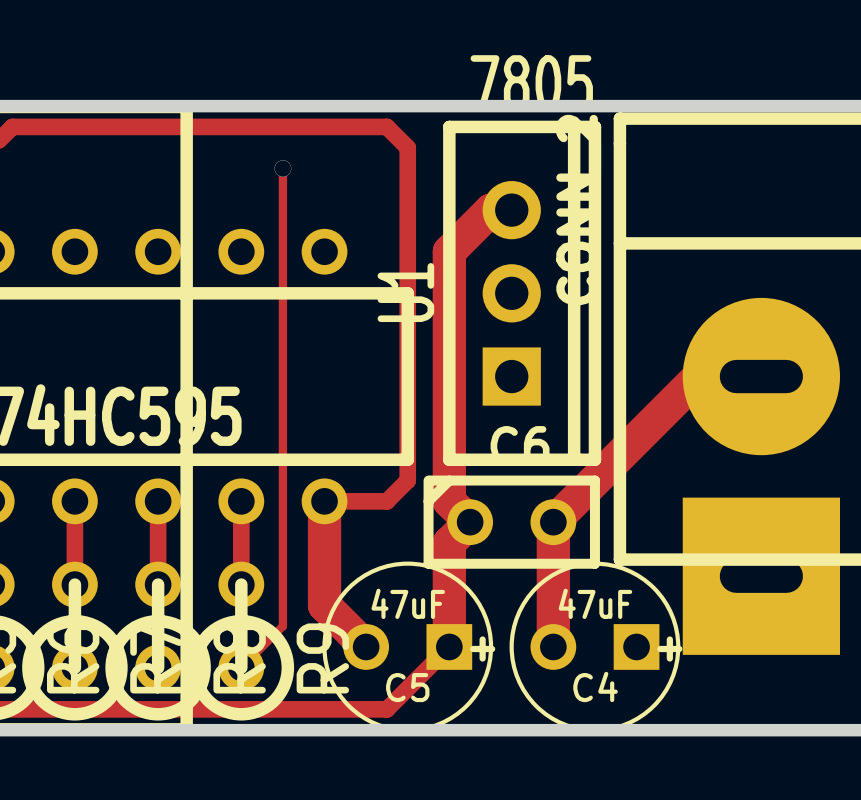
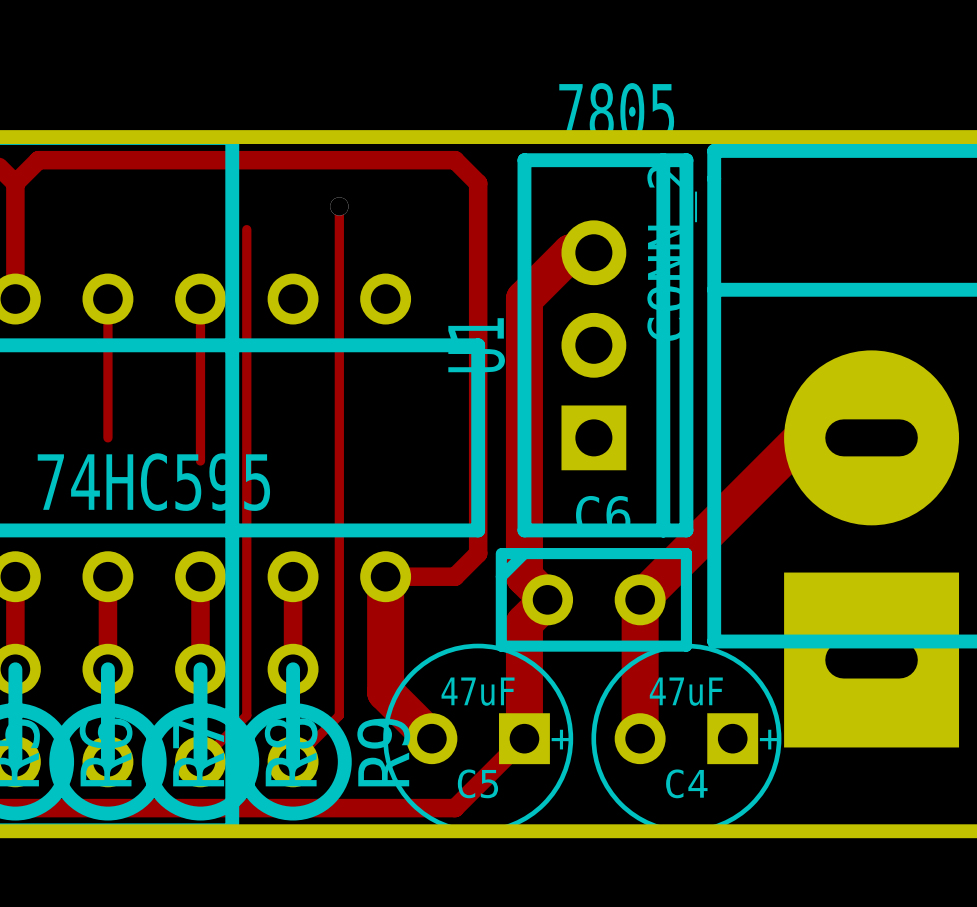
track: none -> (246, 229) (246, 715) (200, 761)
track: none -> (107, 299) (107, 437)
track: none -> (200, 299) (200, 461)

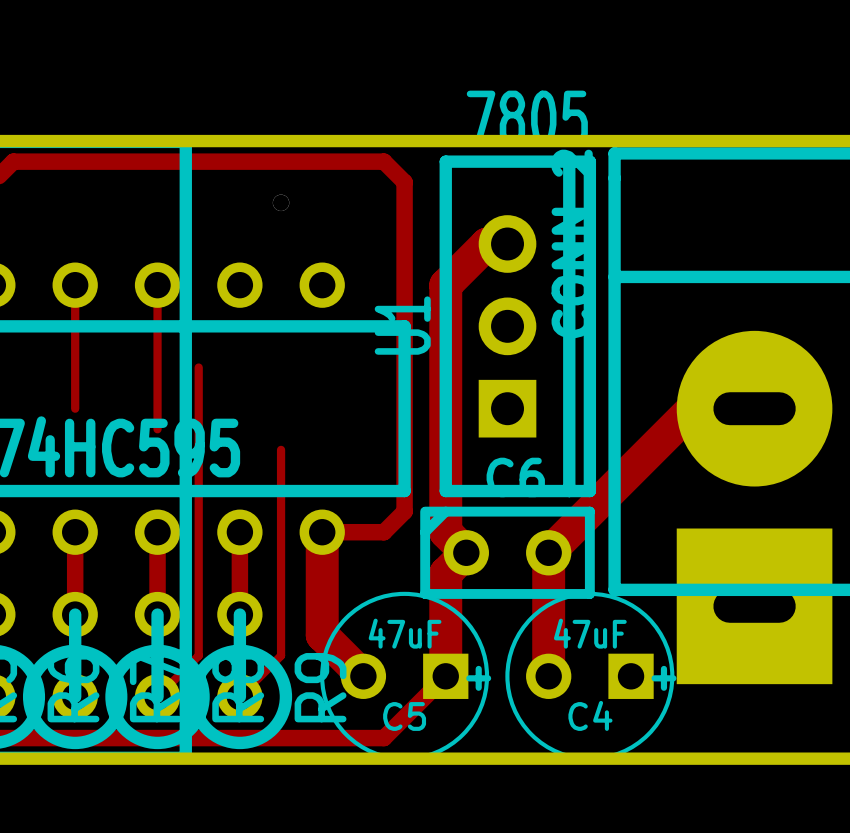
track: (339, 206) (339, 484) -> none
track: (246, 229) (246, 391) -> none

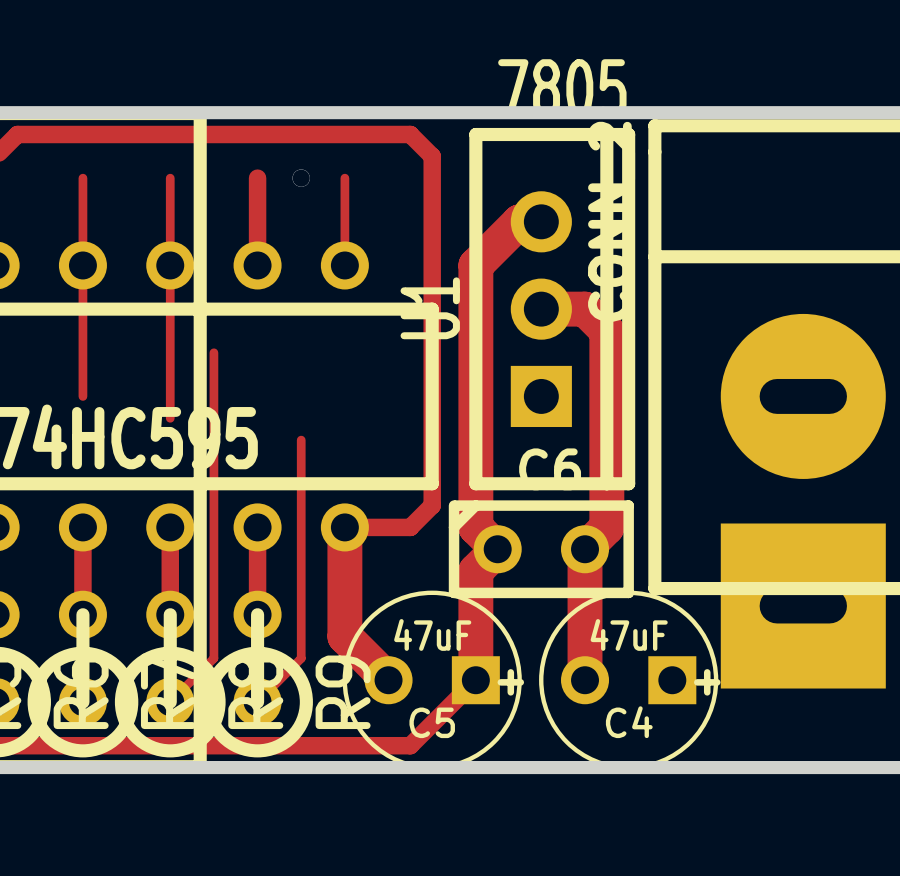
track: none -> (82, 178) (82, 265)
track: none -> (170, 178) (170, 265)
track: none -> (257, 178) (257, 265)
track: none -> (344, 178) (344, 265)
track: (754, 408) (692, 408) (569, 532) -> (541, 309) (585, 309) (606, 330) (606, 527)

